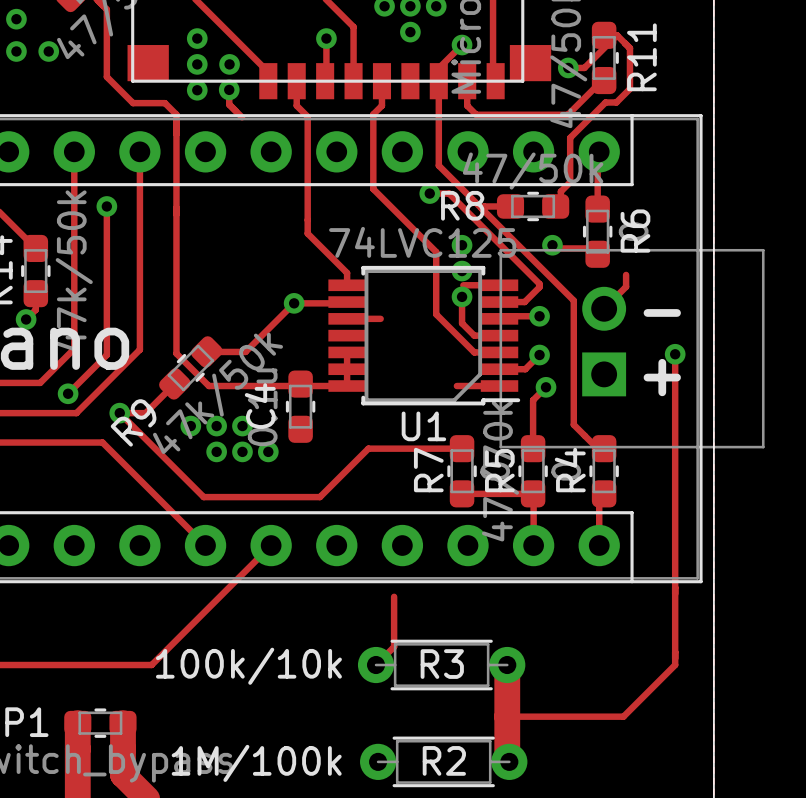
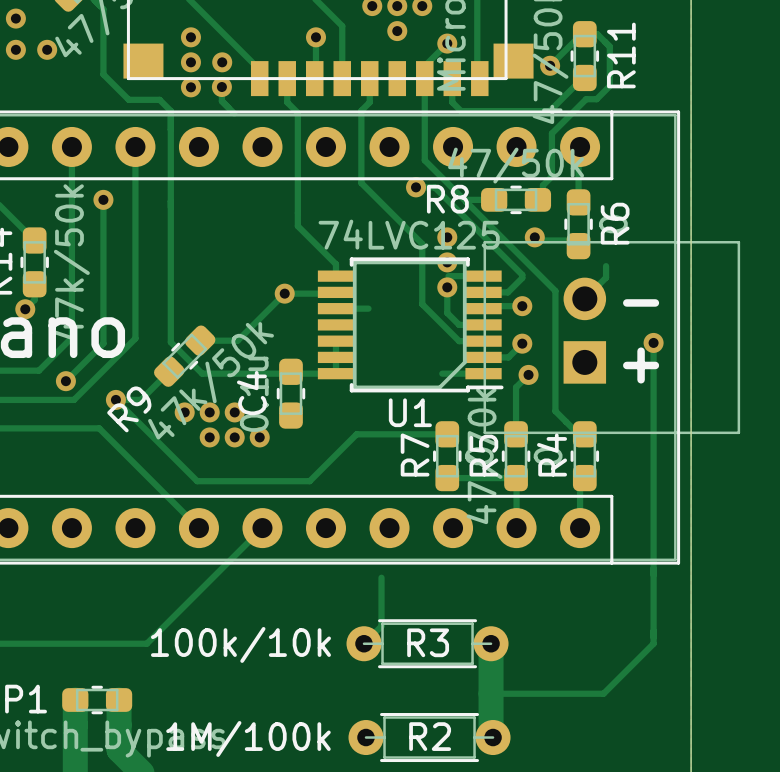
track: none -> (584, 34) (581, 34) (553, 62)
track: (617, 35) (584, 67) (568, 67) -> none

